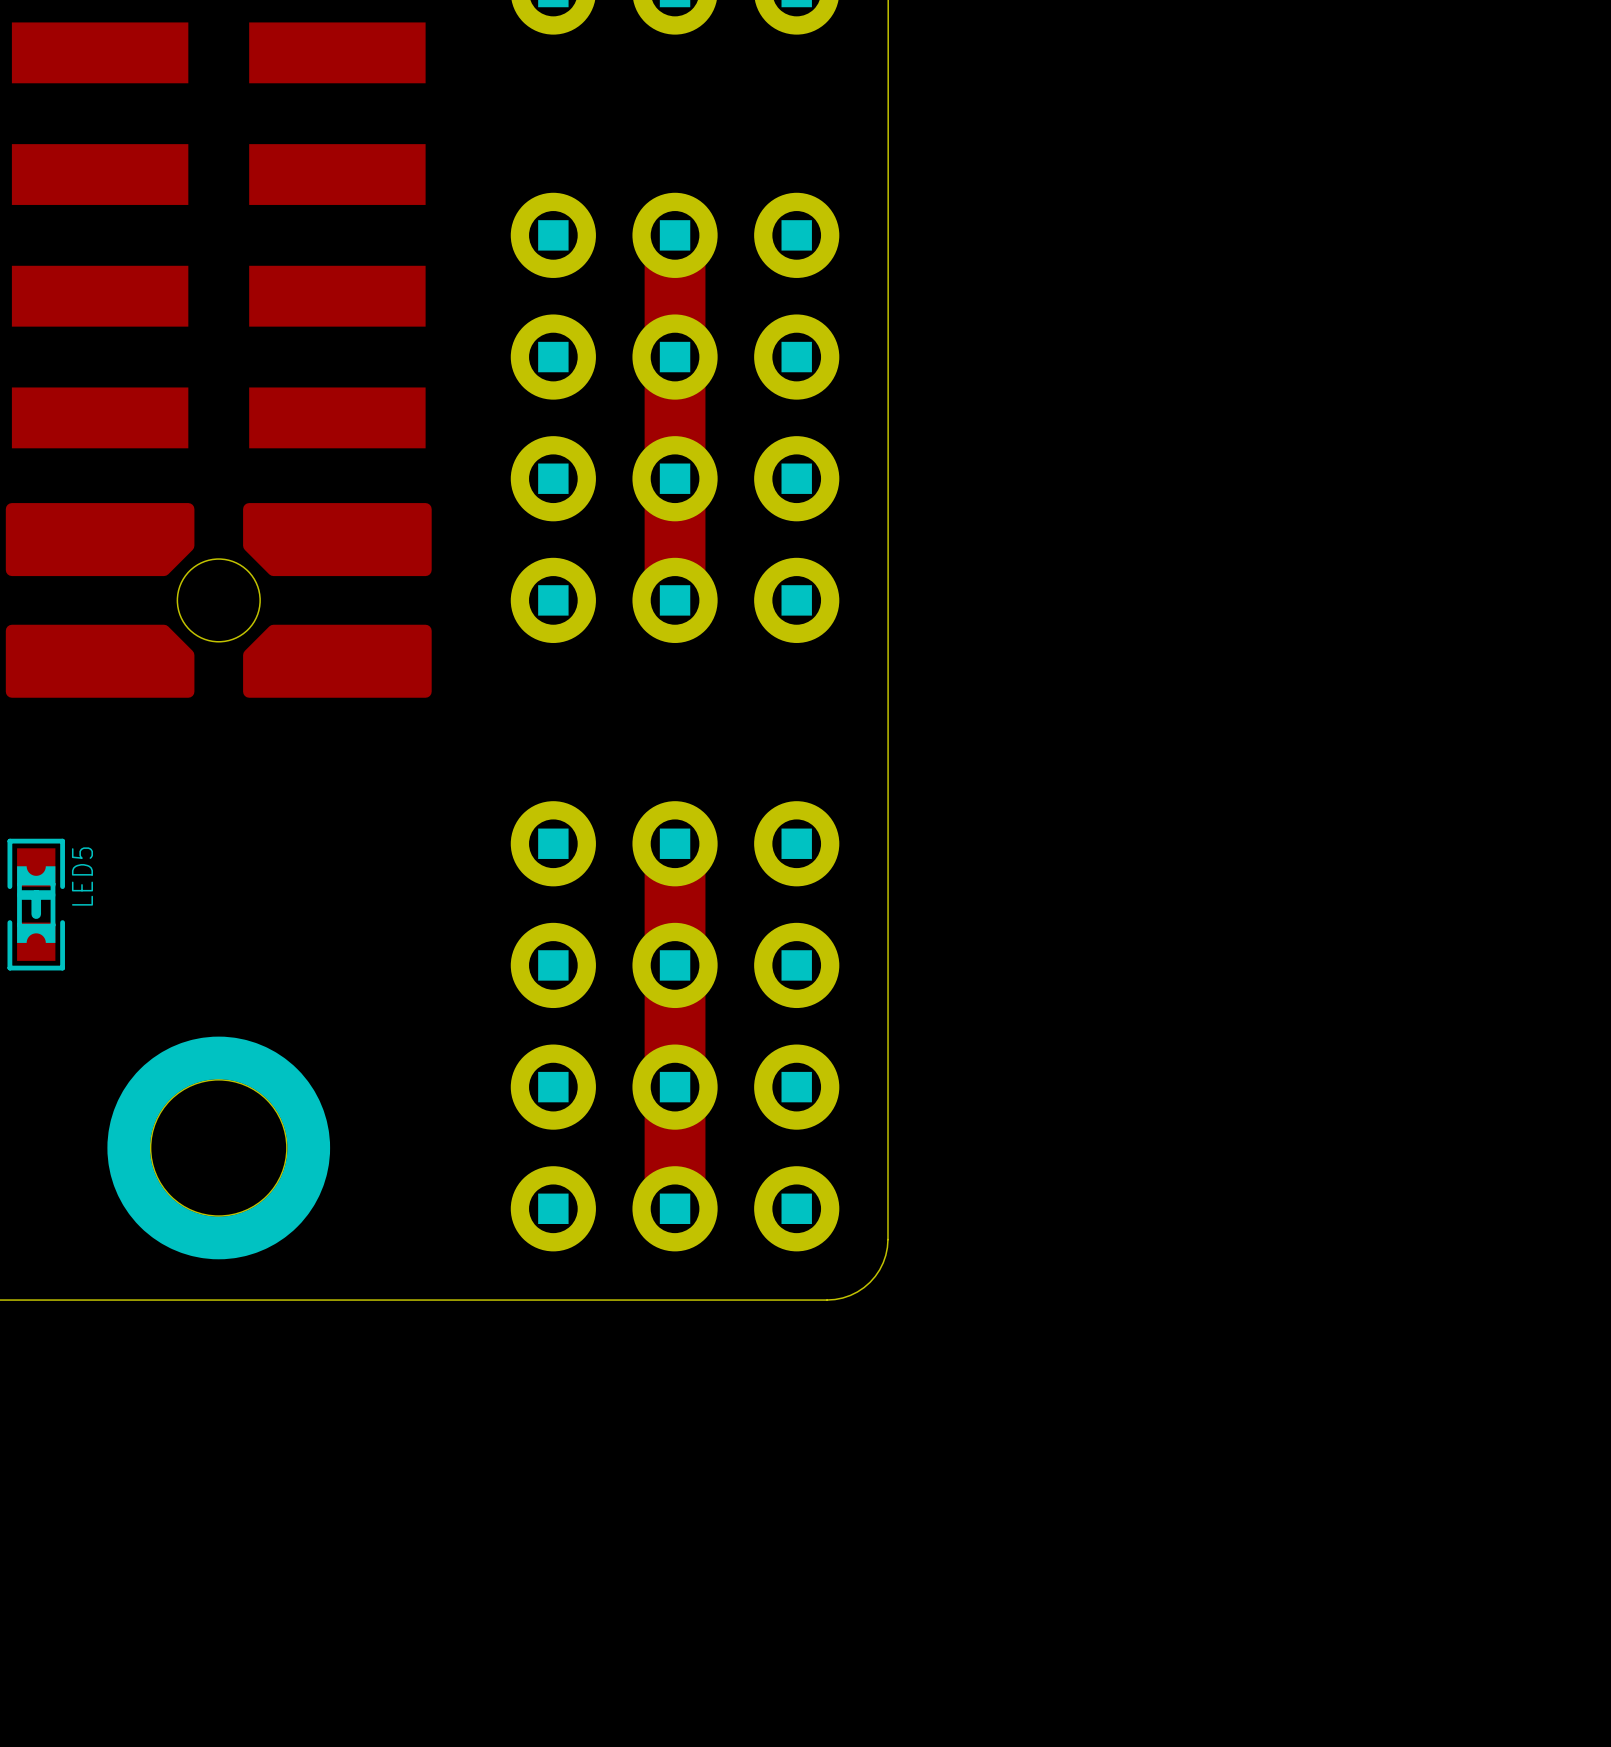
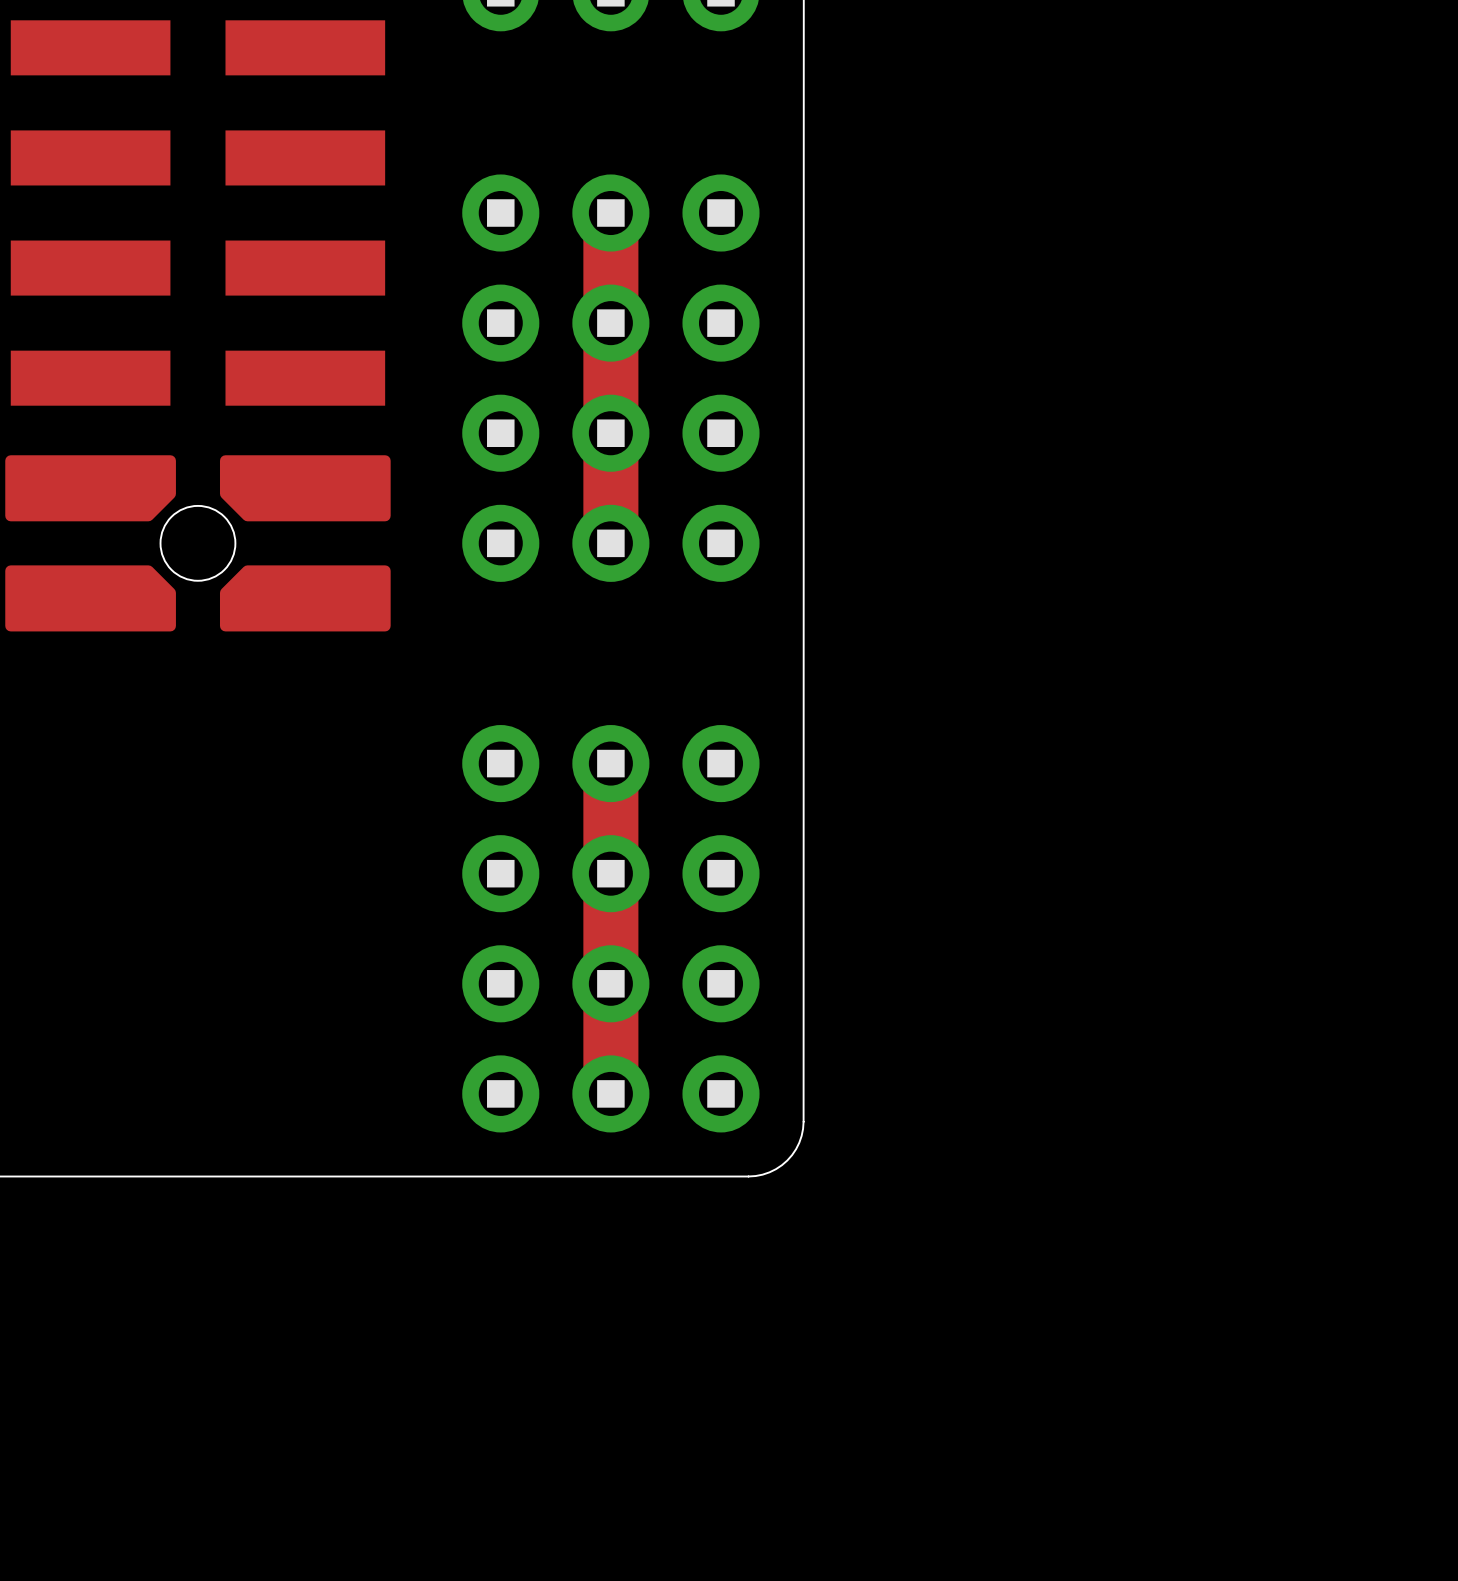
LED5: (36, 904) -> none
part: (218, 1147) -> none

